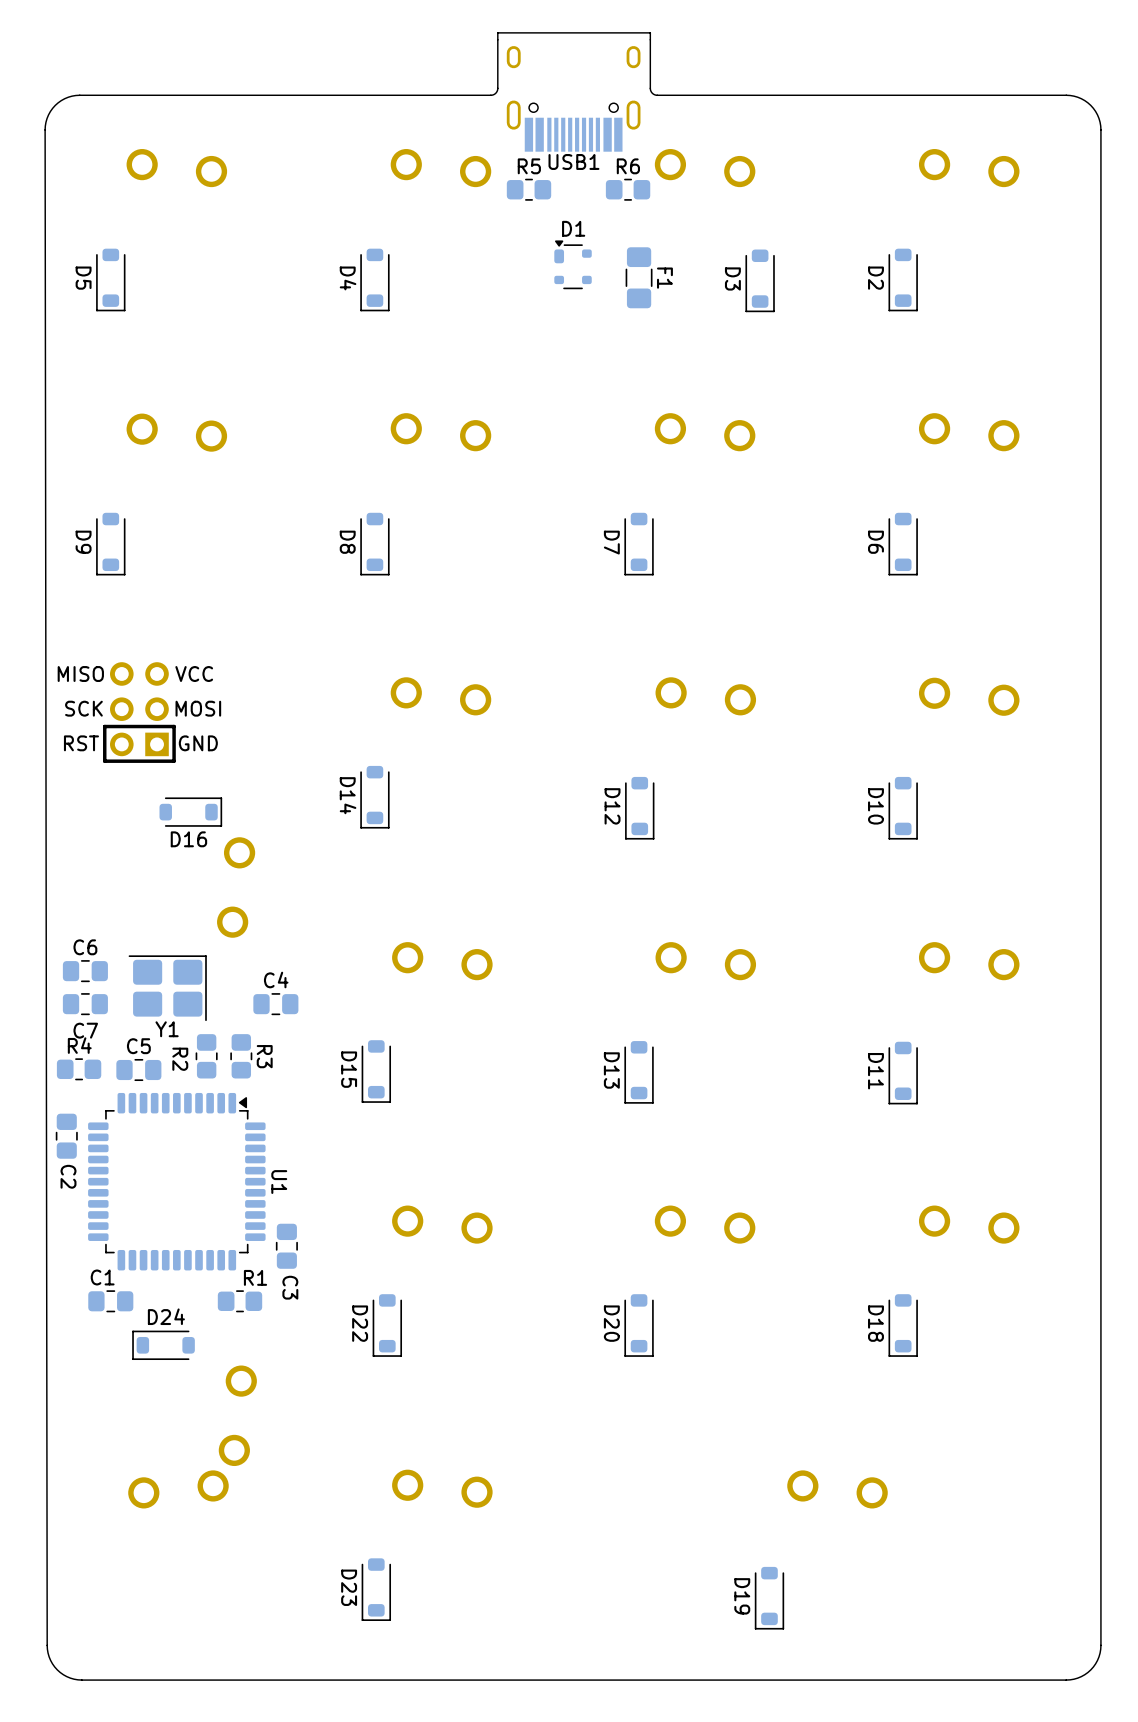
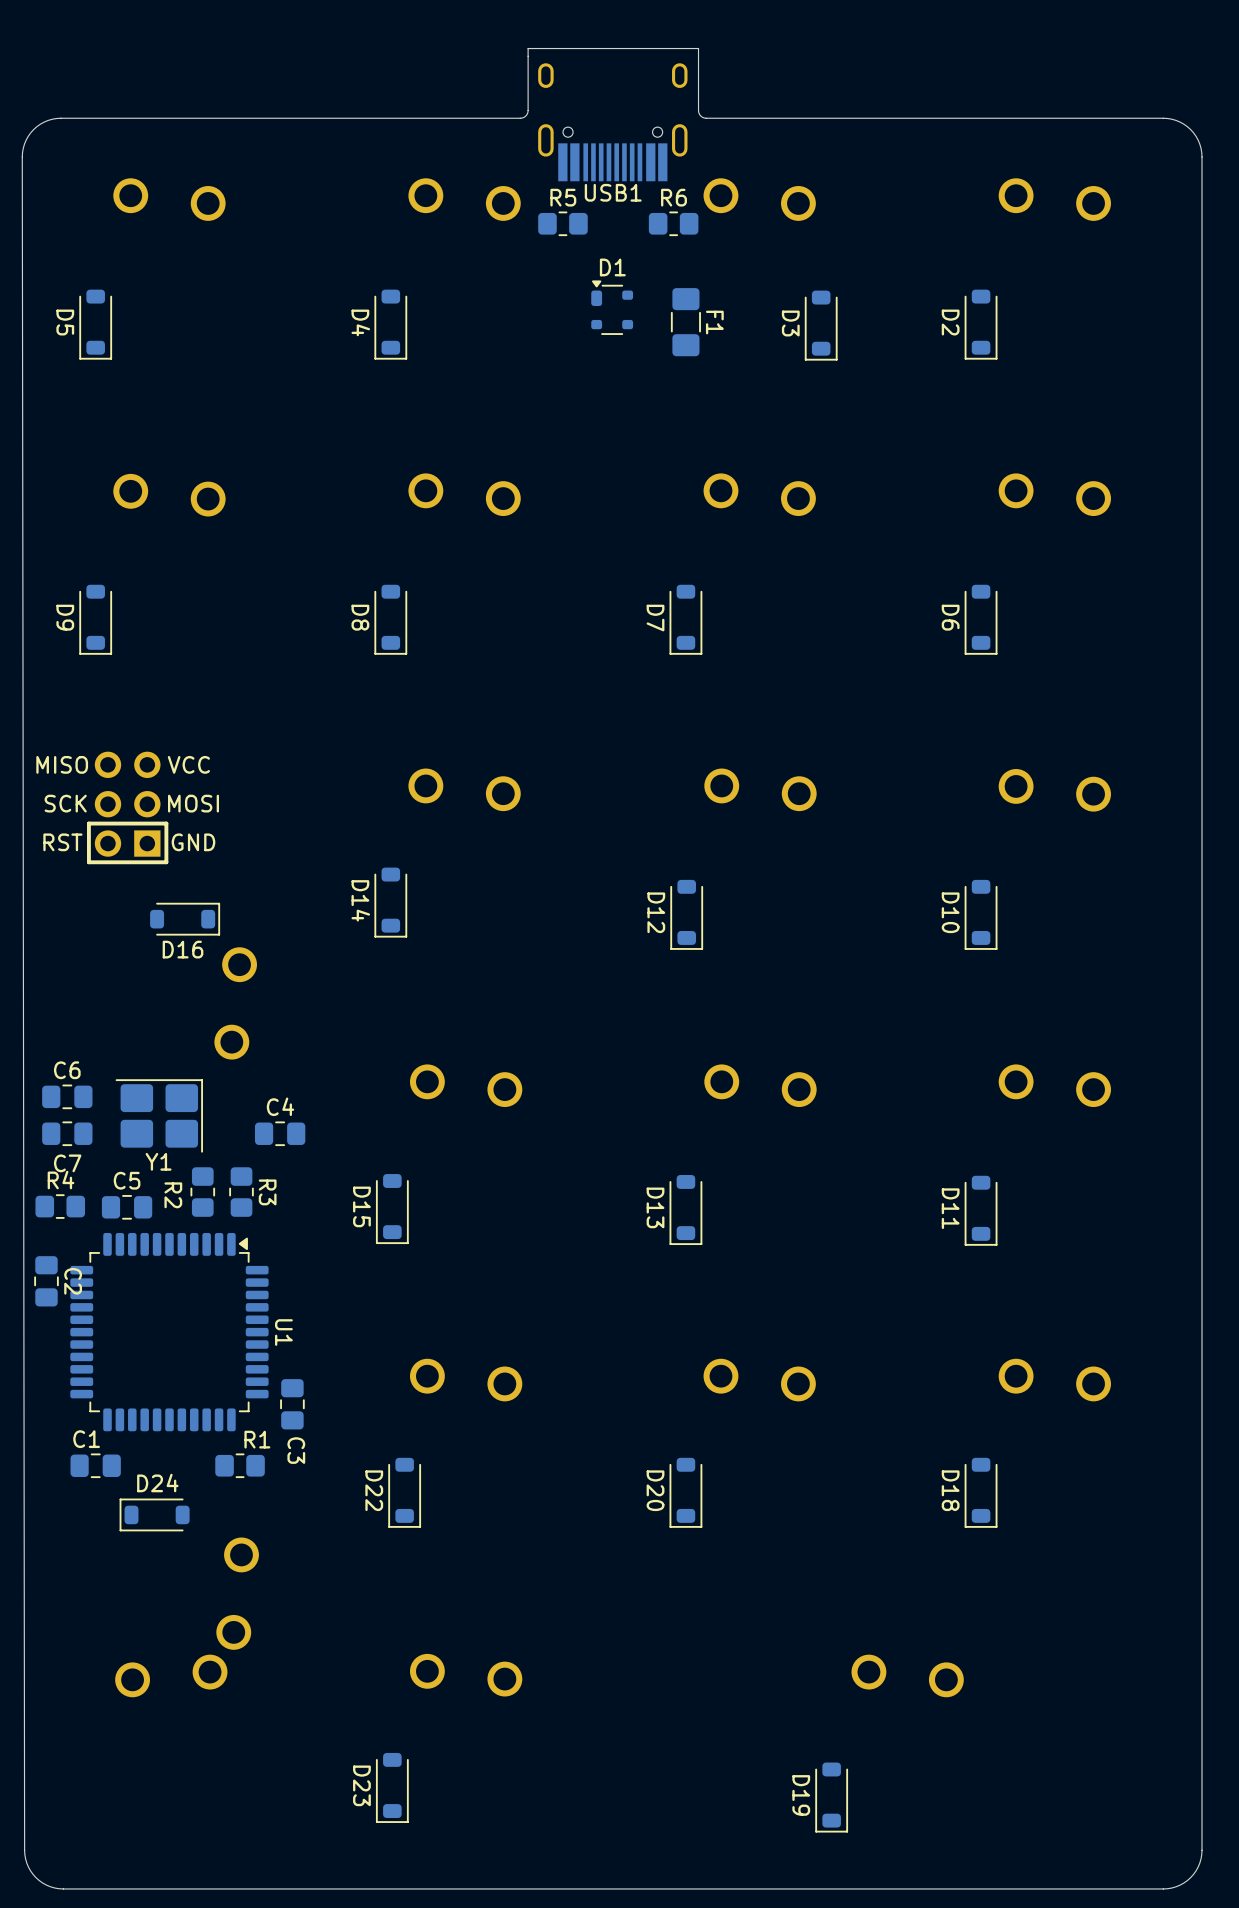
C2 name position: C2 (68, 1176) -> C2 (73, 1281)

